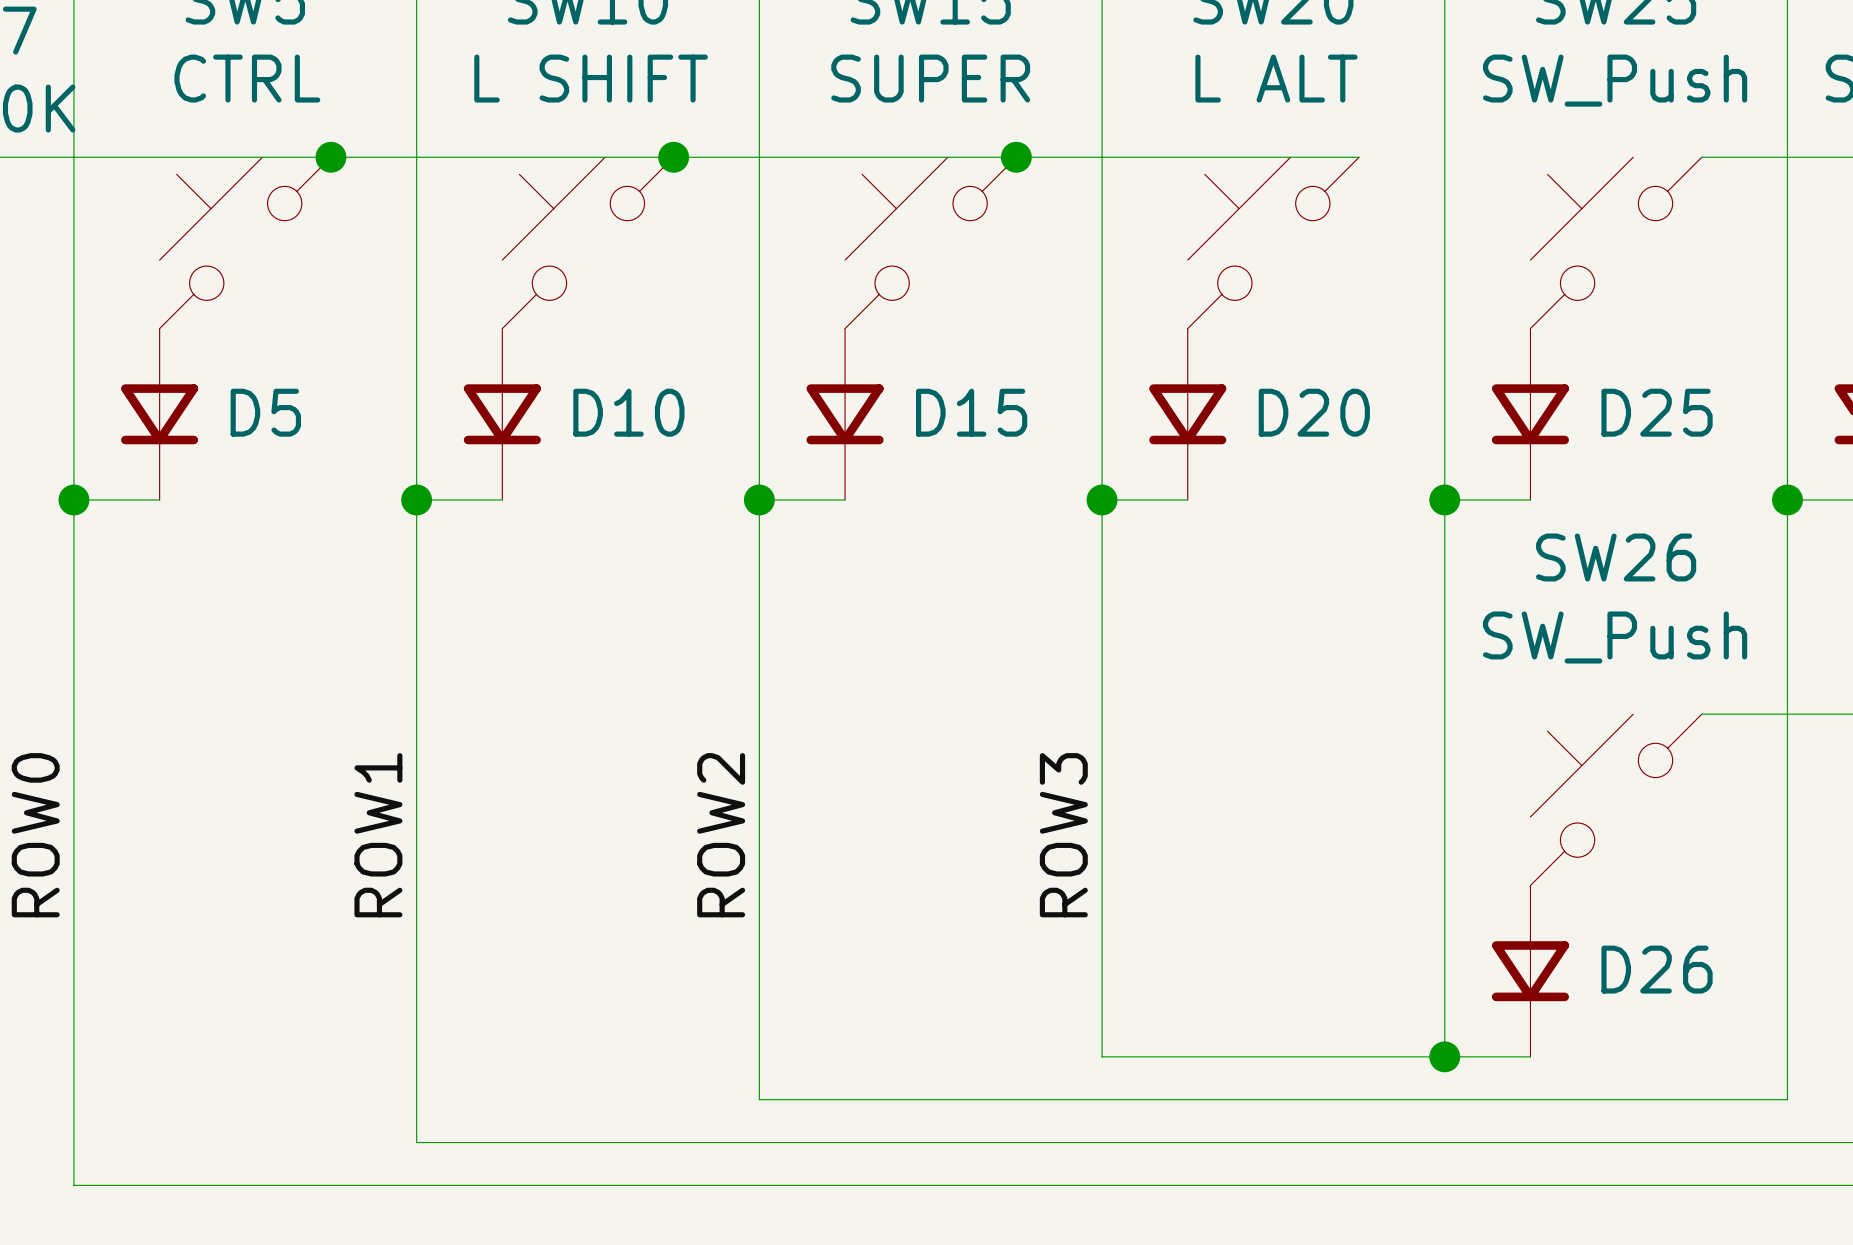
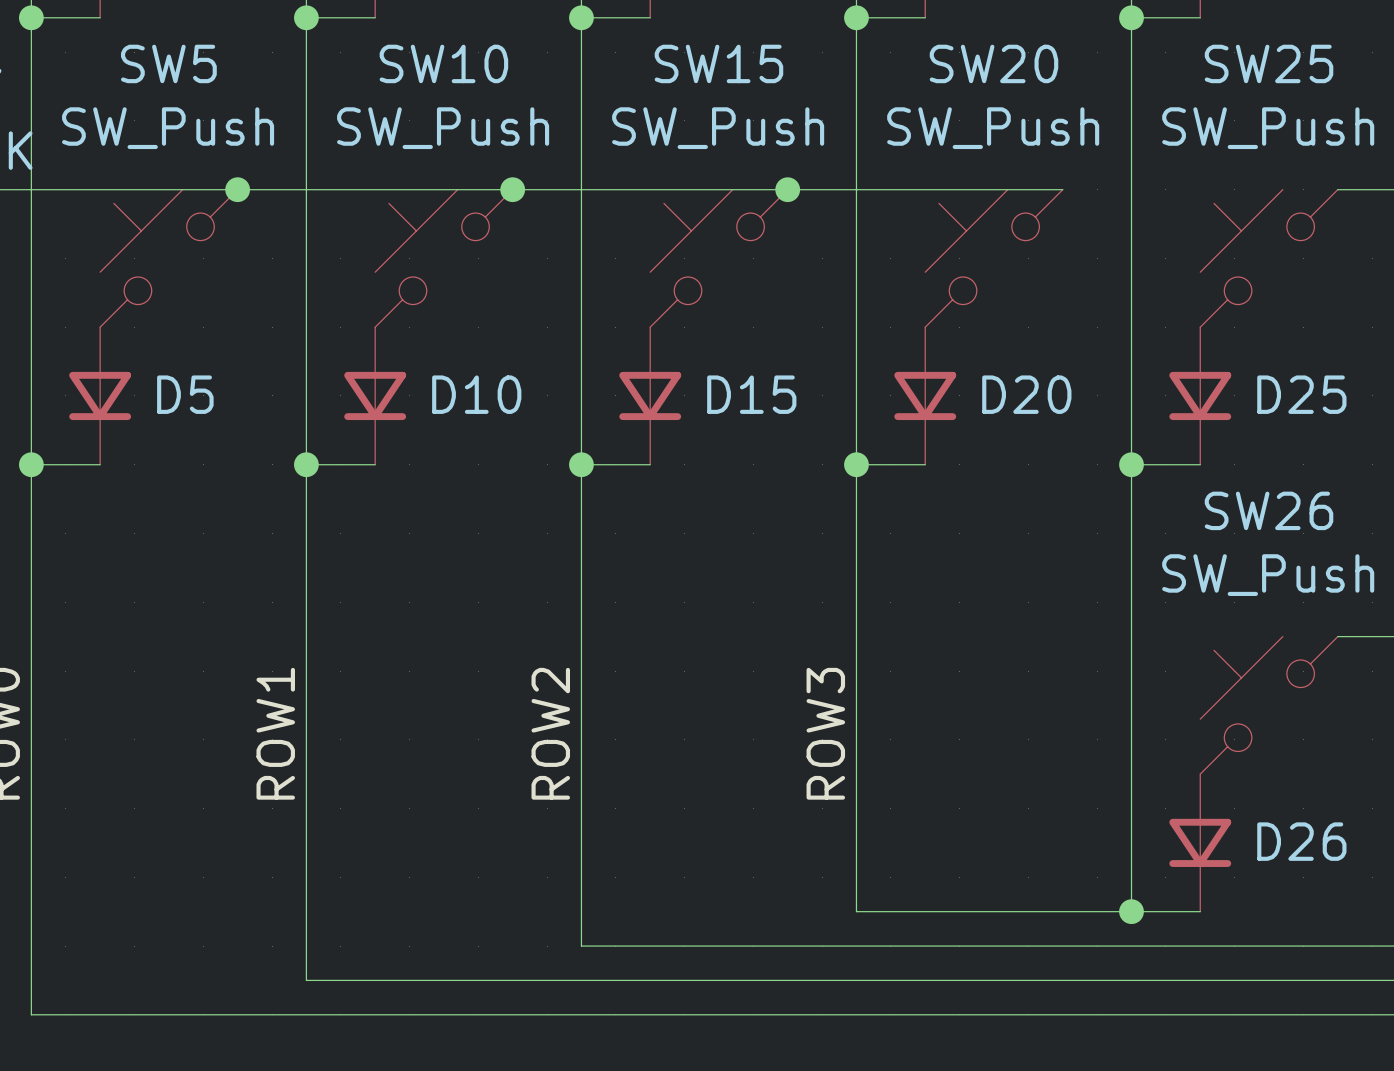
SW5 value: CTRL (247, 78) -> SW_Push (168, 128)
SW10 value: L SHIFT (591, 78) -> SW_Push (443, 128)
SW15 value: SUPER (930, 78) -> SW_Push (718, 128)
SW20 value: L ALT (1276, 78) -> SW_Push (993, 128)

